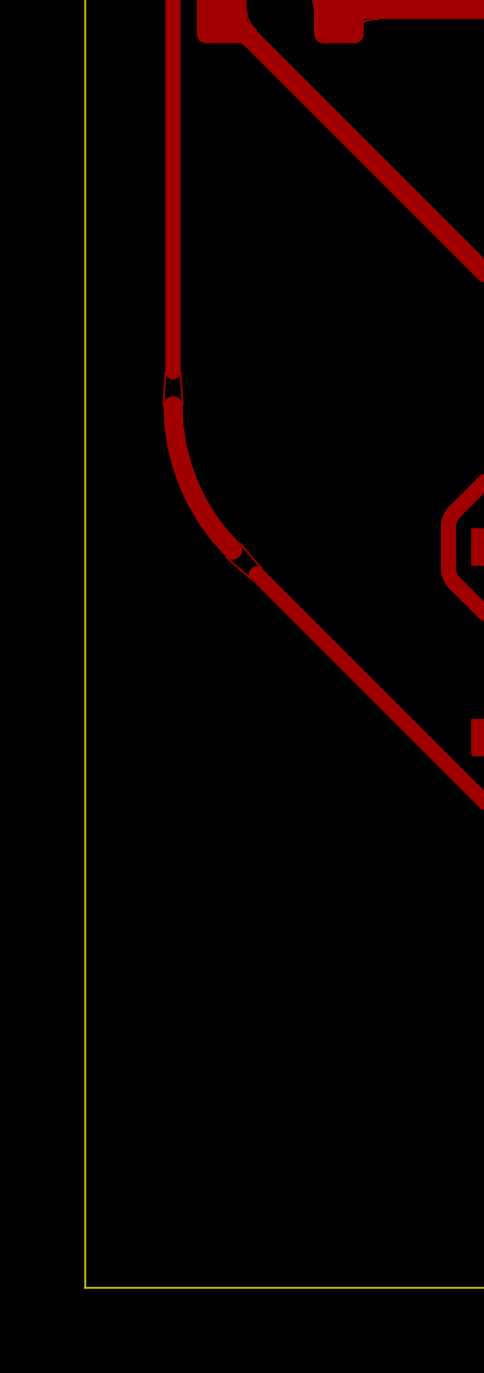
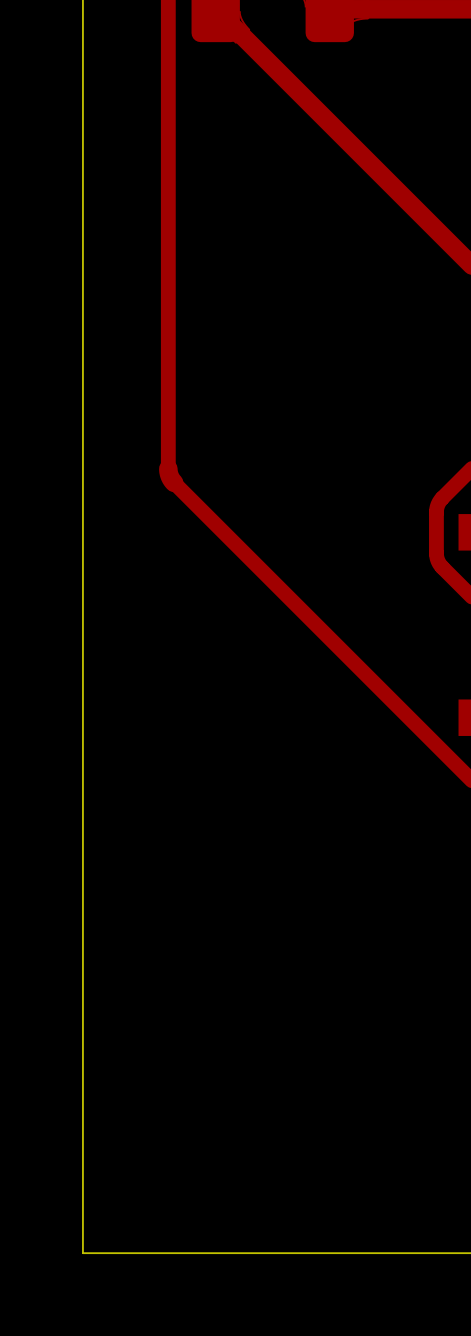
top track: none -> (168, 361) (169, 476) (249, 558)
top zone outline: (180, 371) (165, 371) (163, 405) (182, 405) (180, 371) -> none
top track: (172, 405) (176, 445) (188, 483) (207, 519) (232, 550) -> none
top zone outline: (239, 543) (262, 568) (251, 579) (226, 556) (239, 543) -> none

